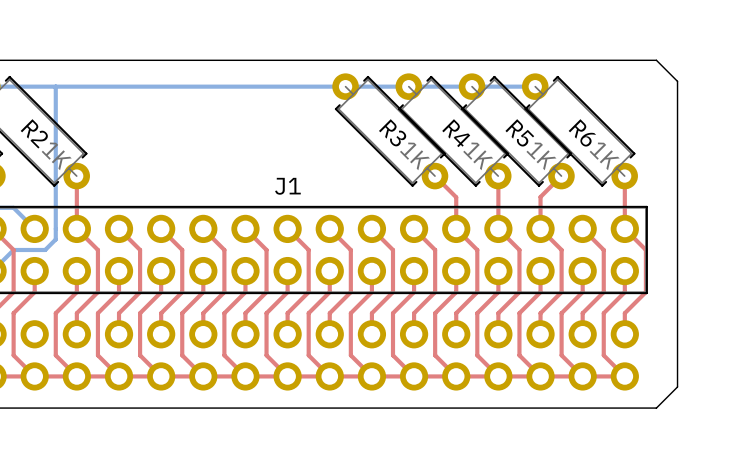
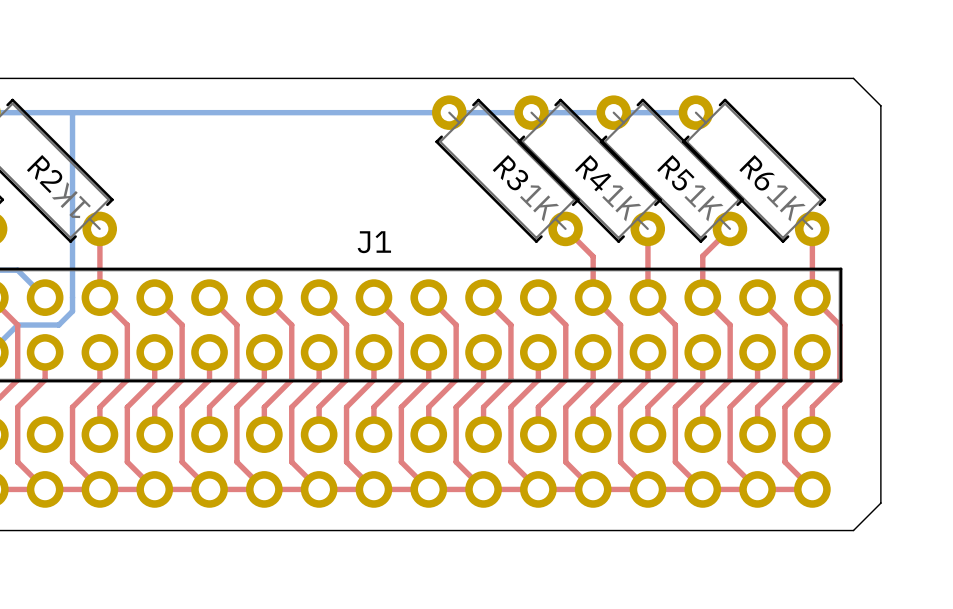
R2 value rotation: 0° (56, 156) -> 180° (71, 200)

